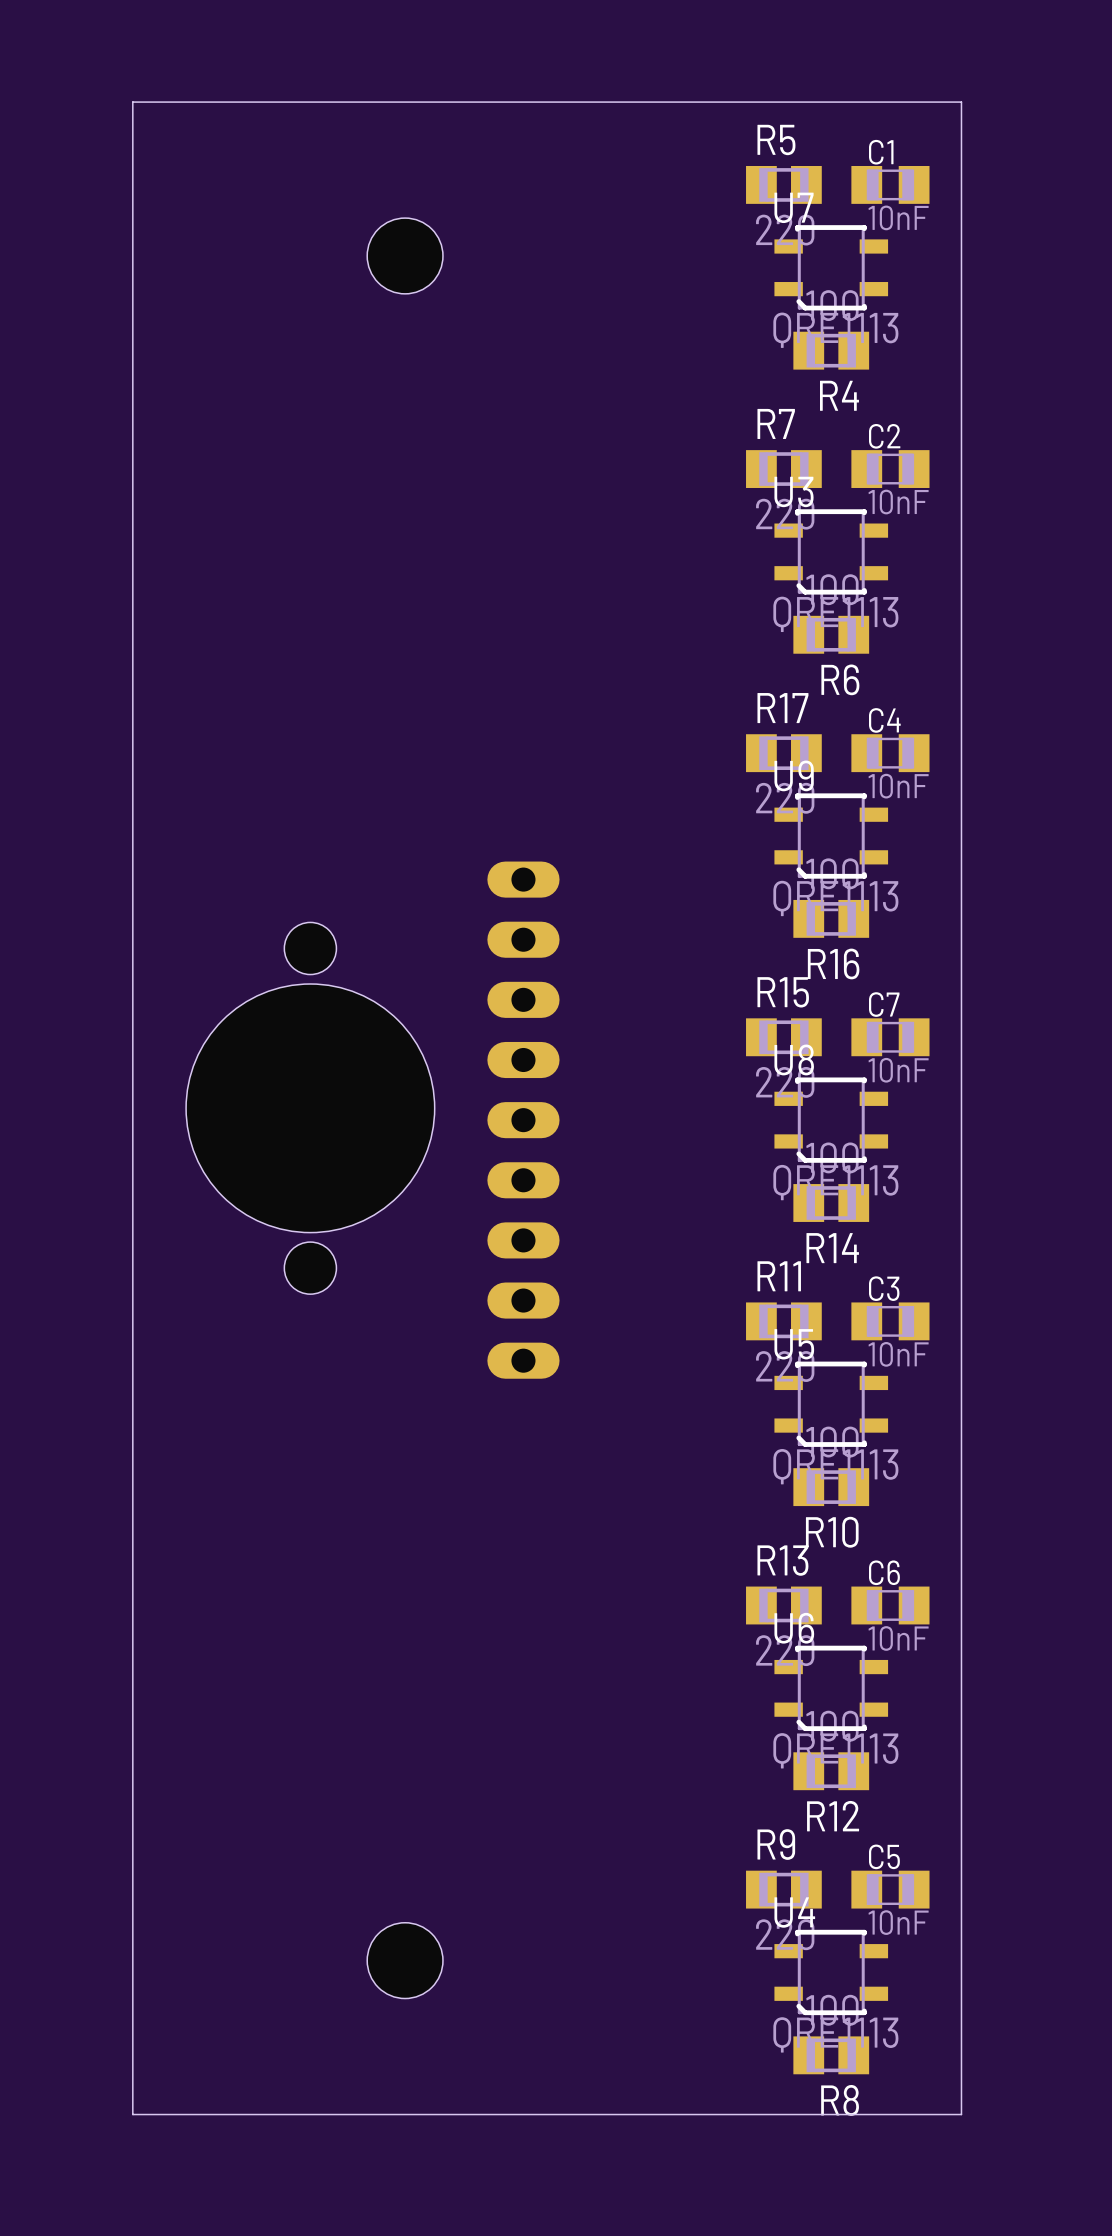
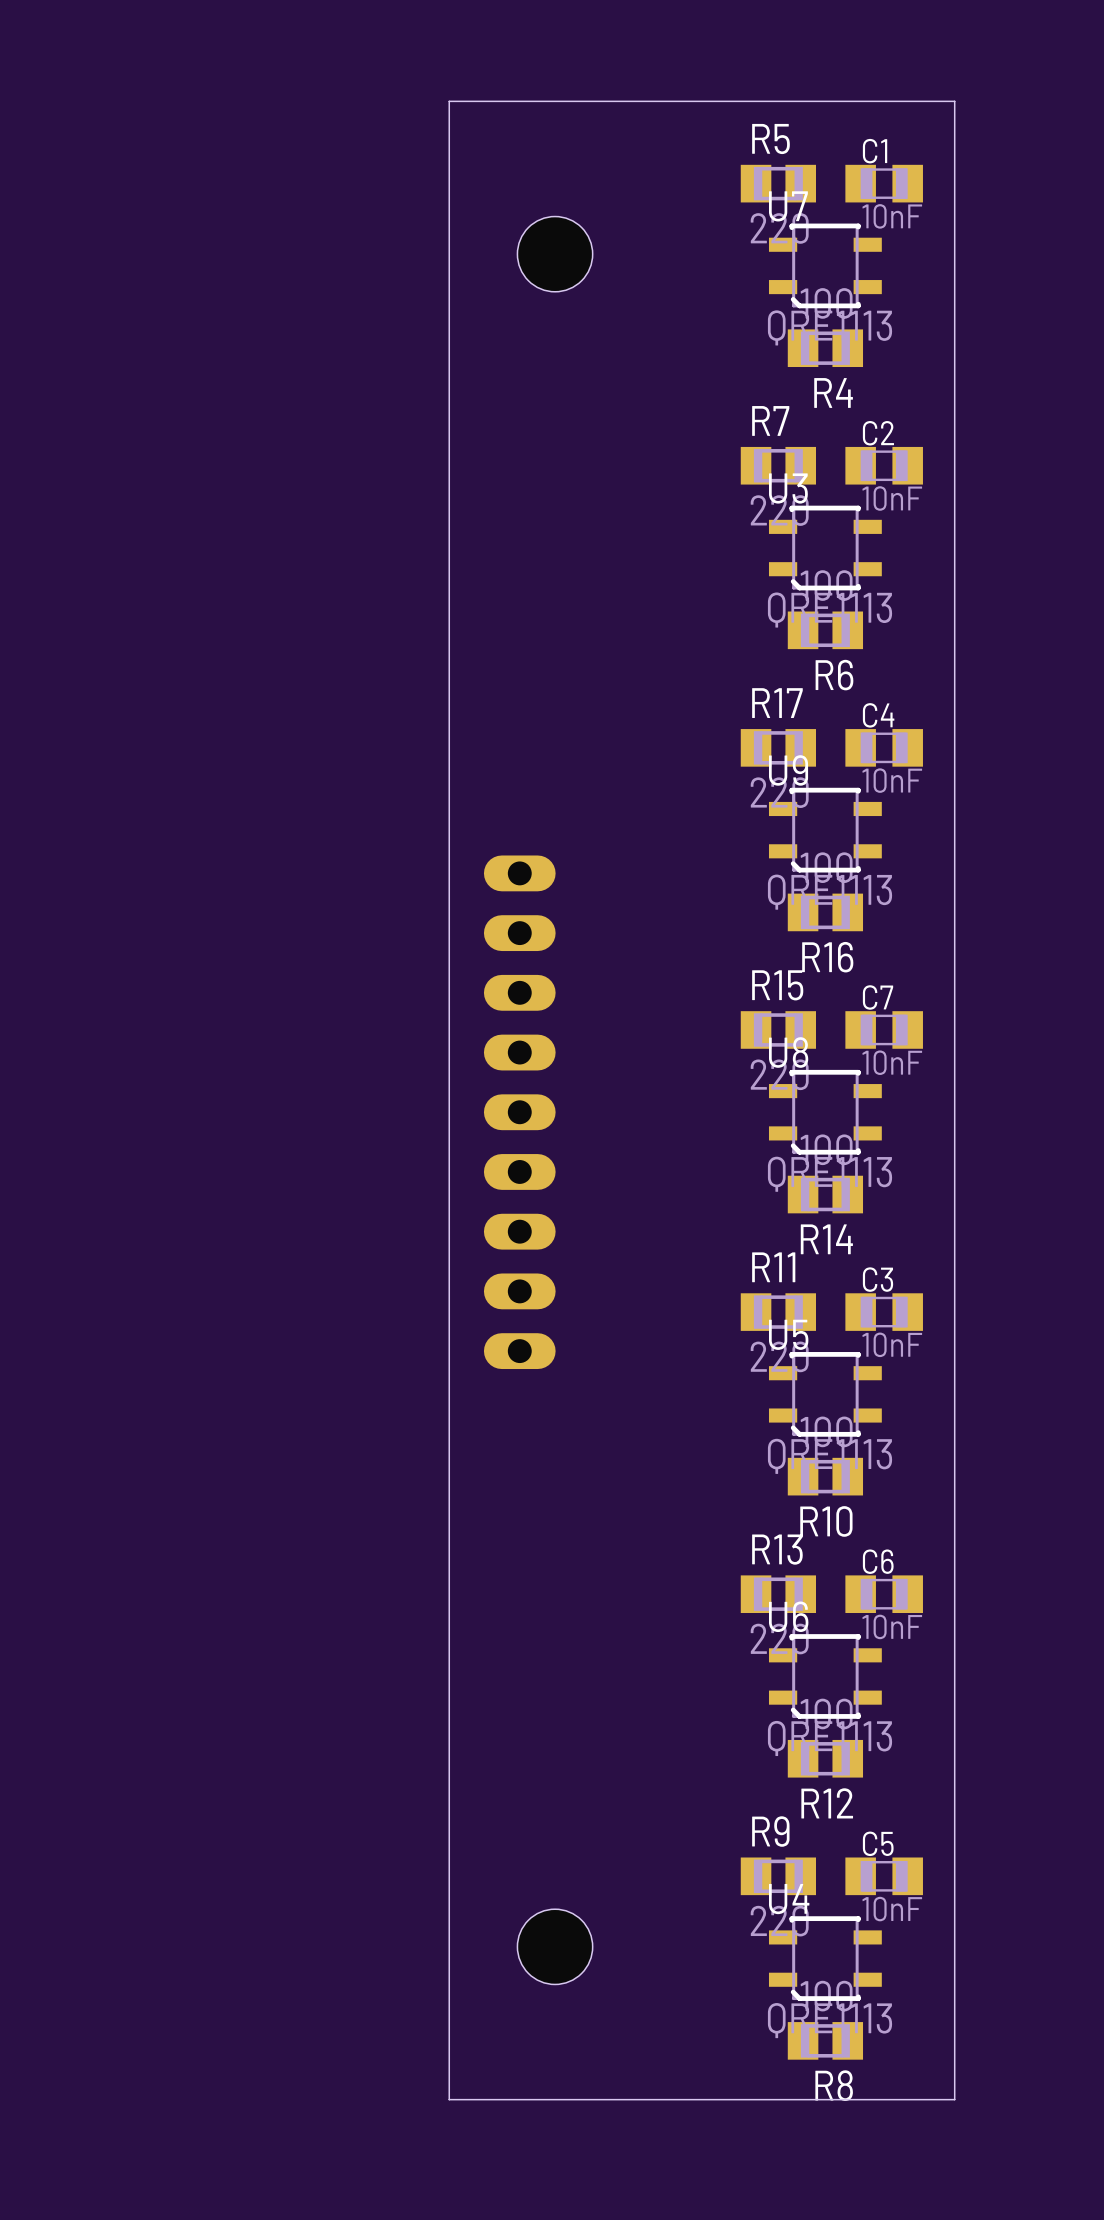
board edge: (452, 102) (132, 102) (132, 2114) (452, 2114) -> (449, 101) (449, 2099)
hole position: (405, 255) -> (555, 254)
hole: (310, 948) -> none
hole: (310, 1108) -> none
hole: (310, 1268) -> none
hole position: (405, 1960) -> (555, 1946)

